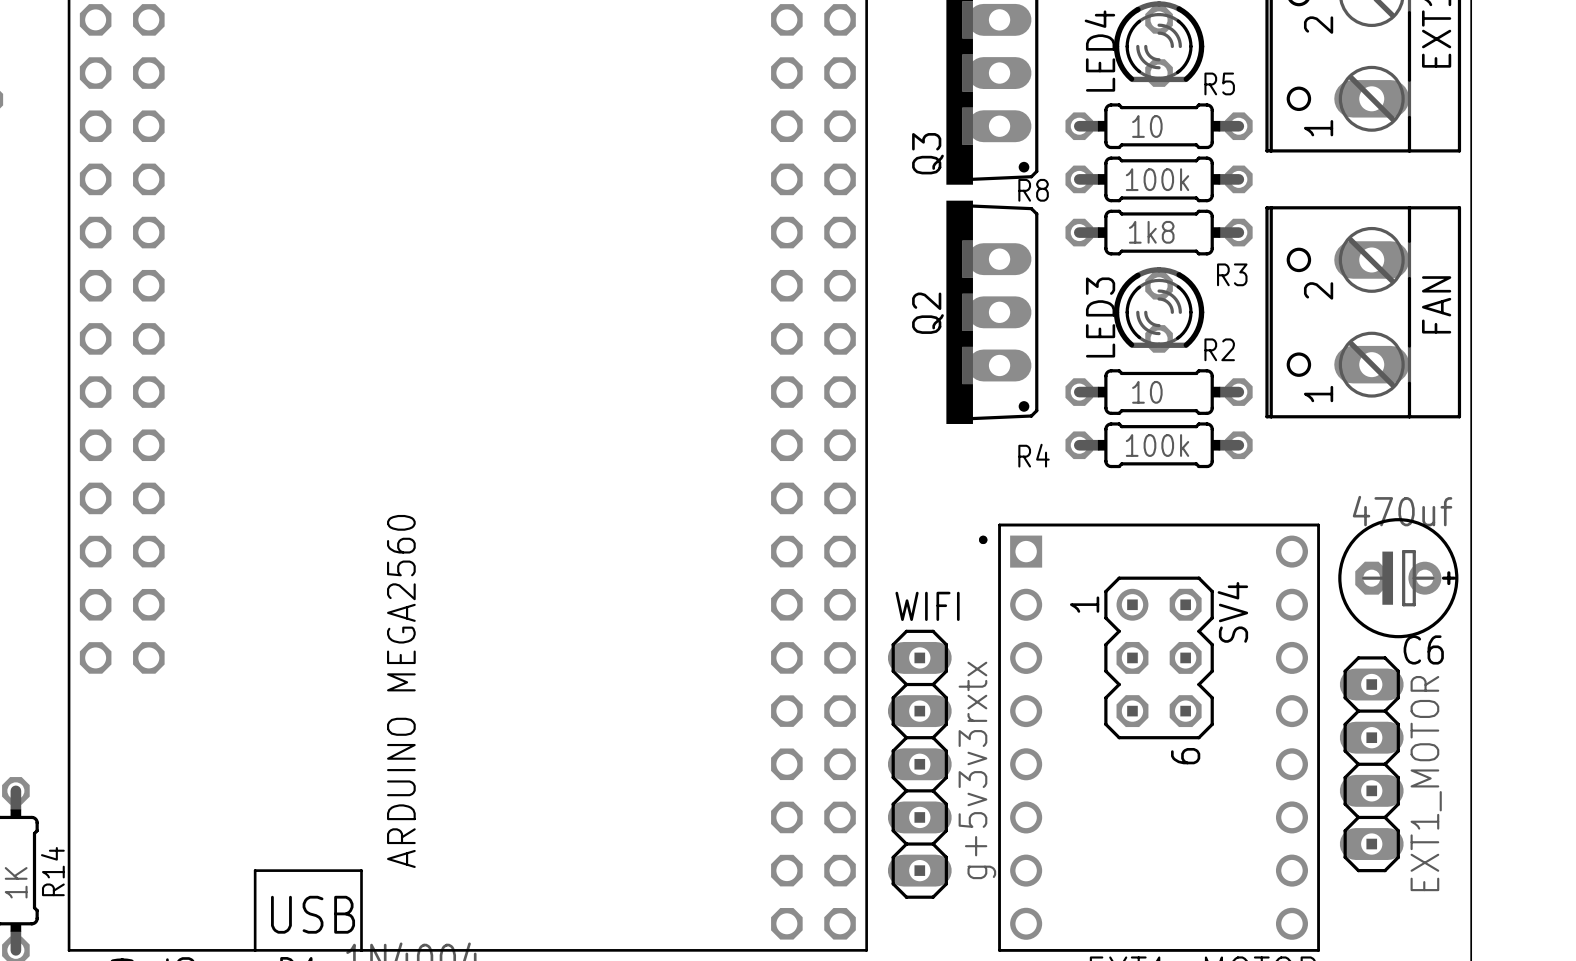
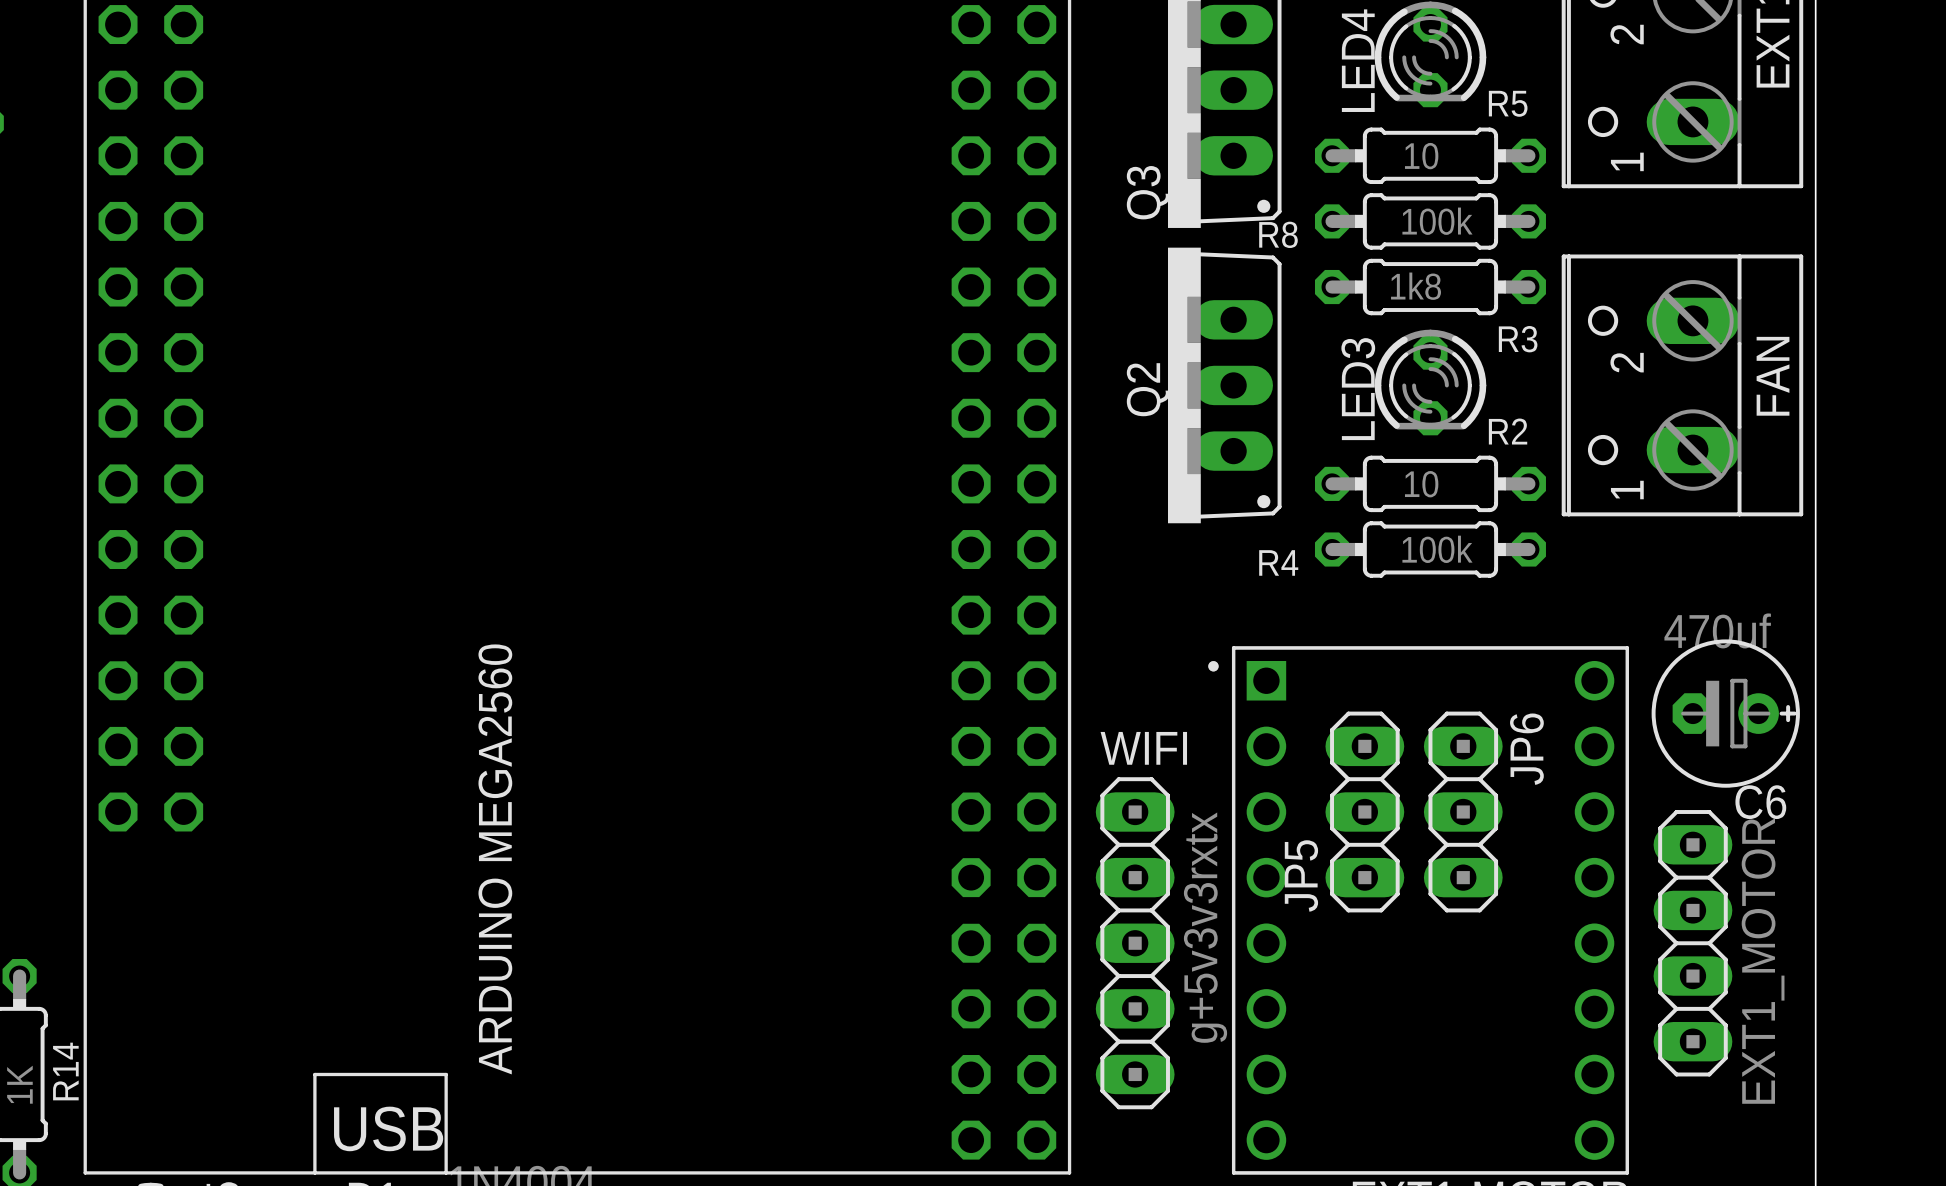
JP5: none -> (1364, 812)
SV4: (1159, 657) -> none
JP6: none -> (1463, 812)

